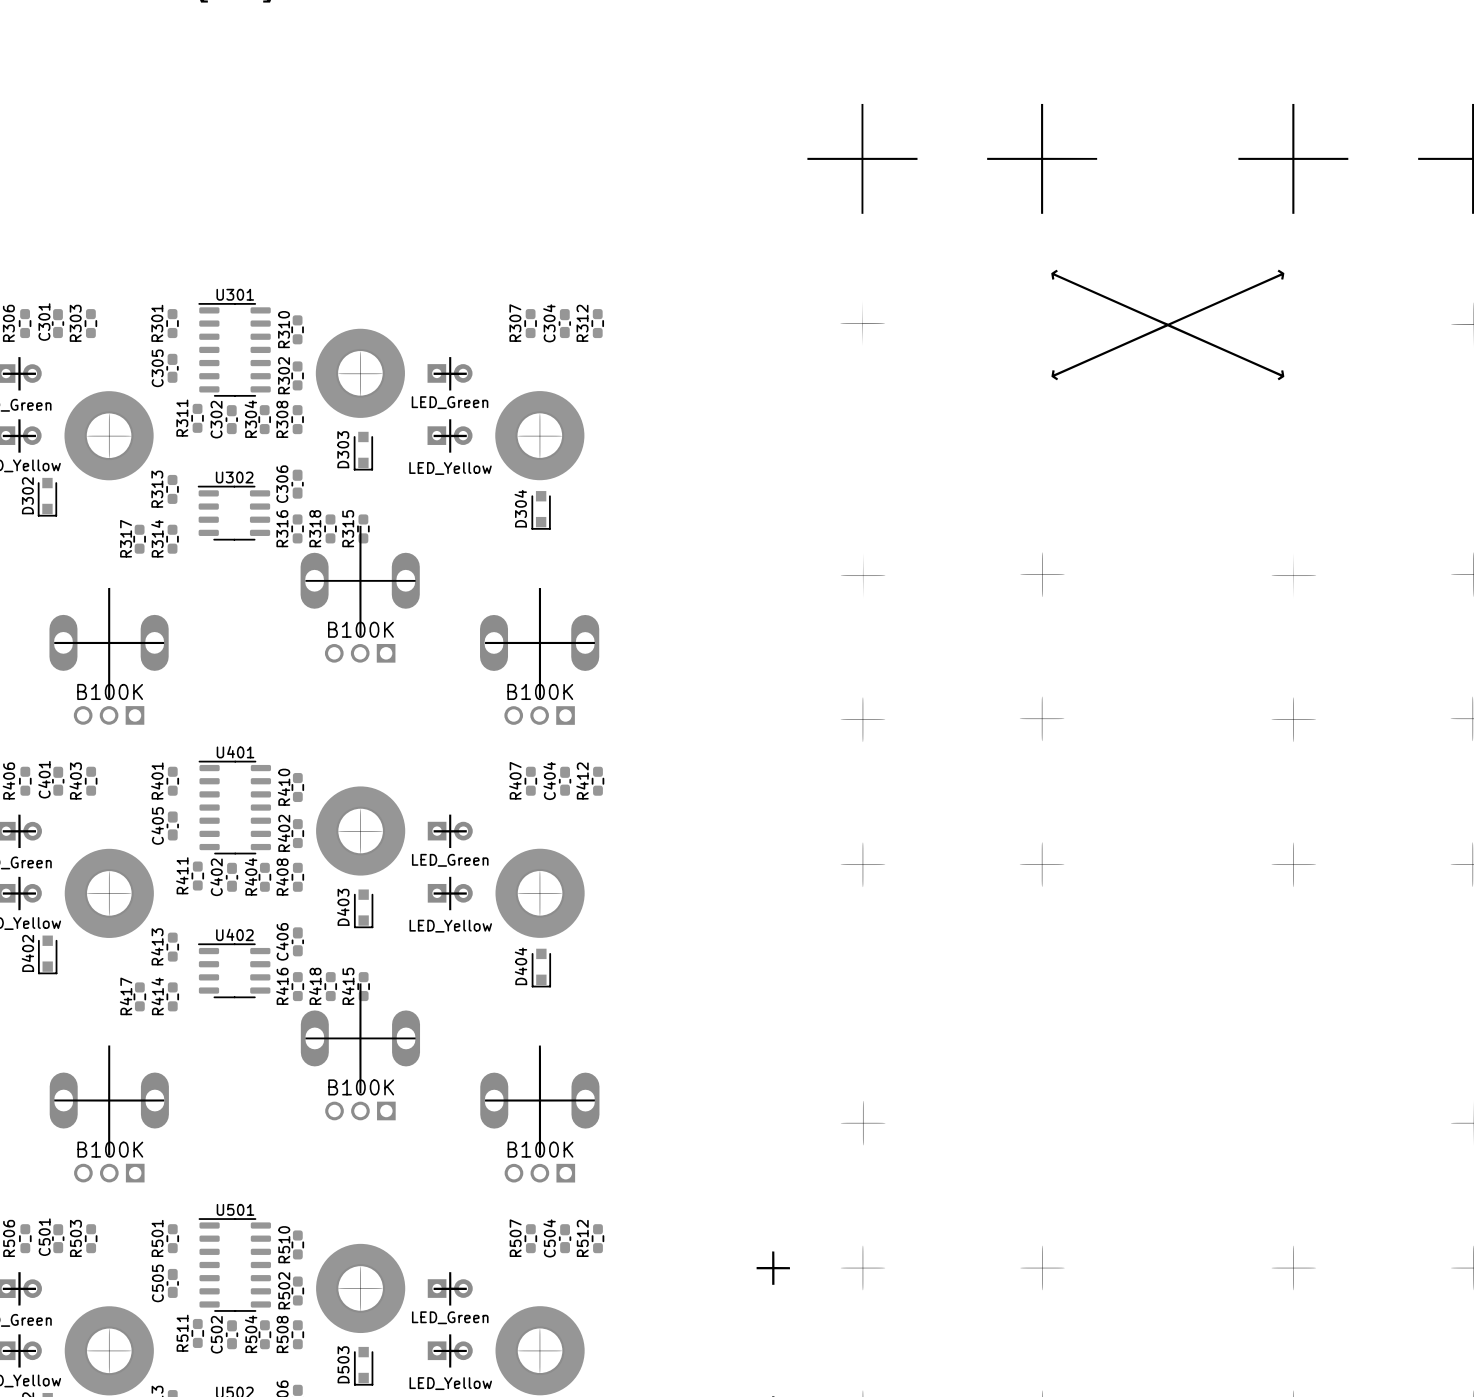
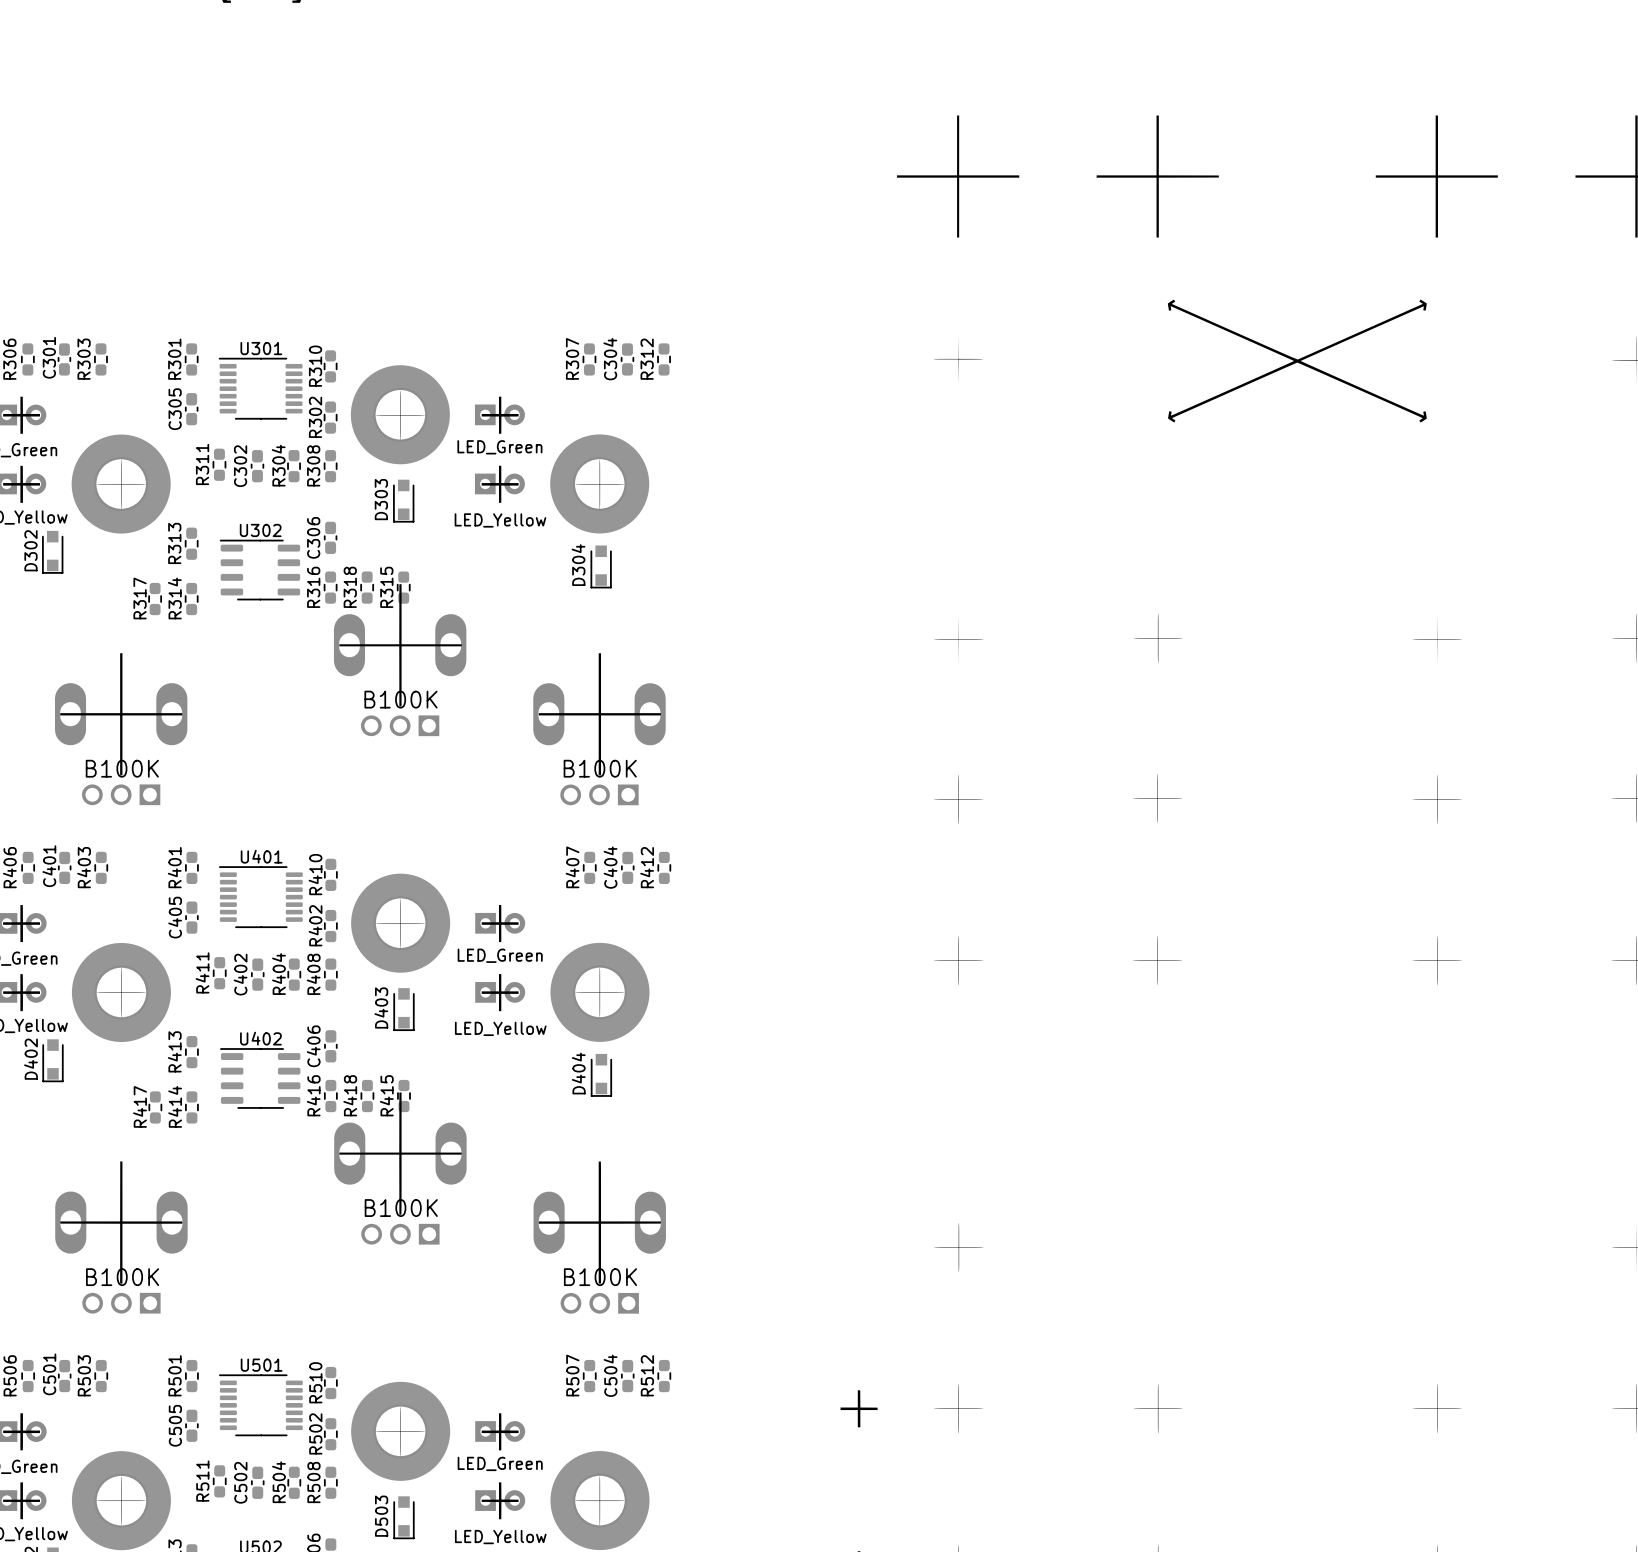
U301 footprint: [198, 303, 271, 397] -> [218, 357, 303, 420]
U401 footprint: [198, 760, 272, 855] -> [219, 866, 303, 928]
U501 footprint: [198, 1218, 272, 1312] -> [219, 1374, 303, 1437]

